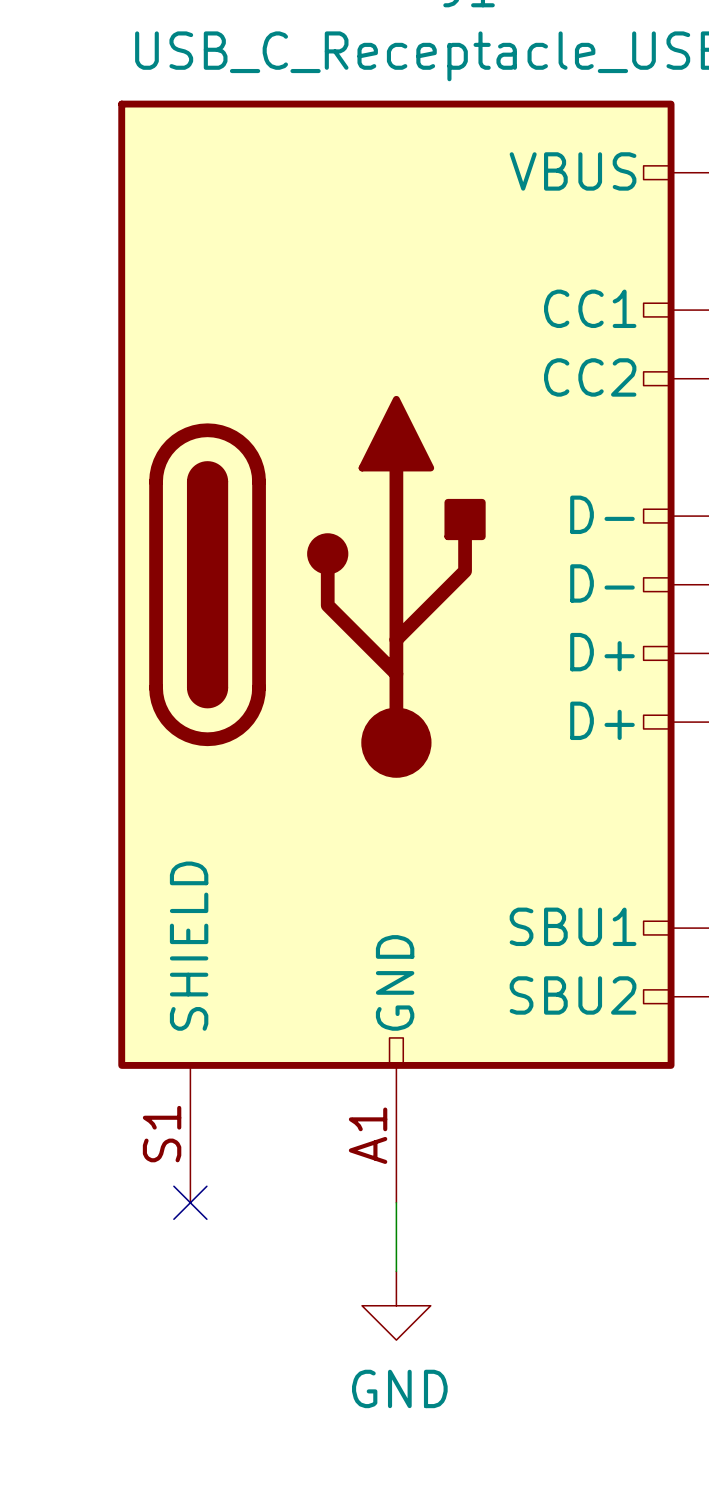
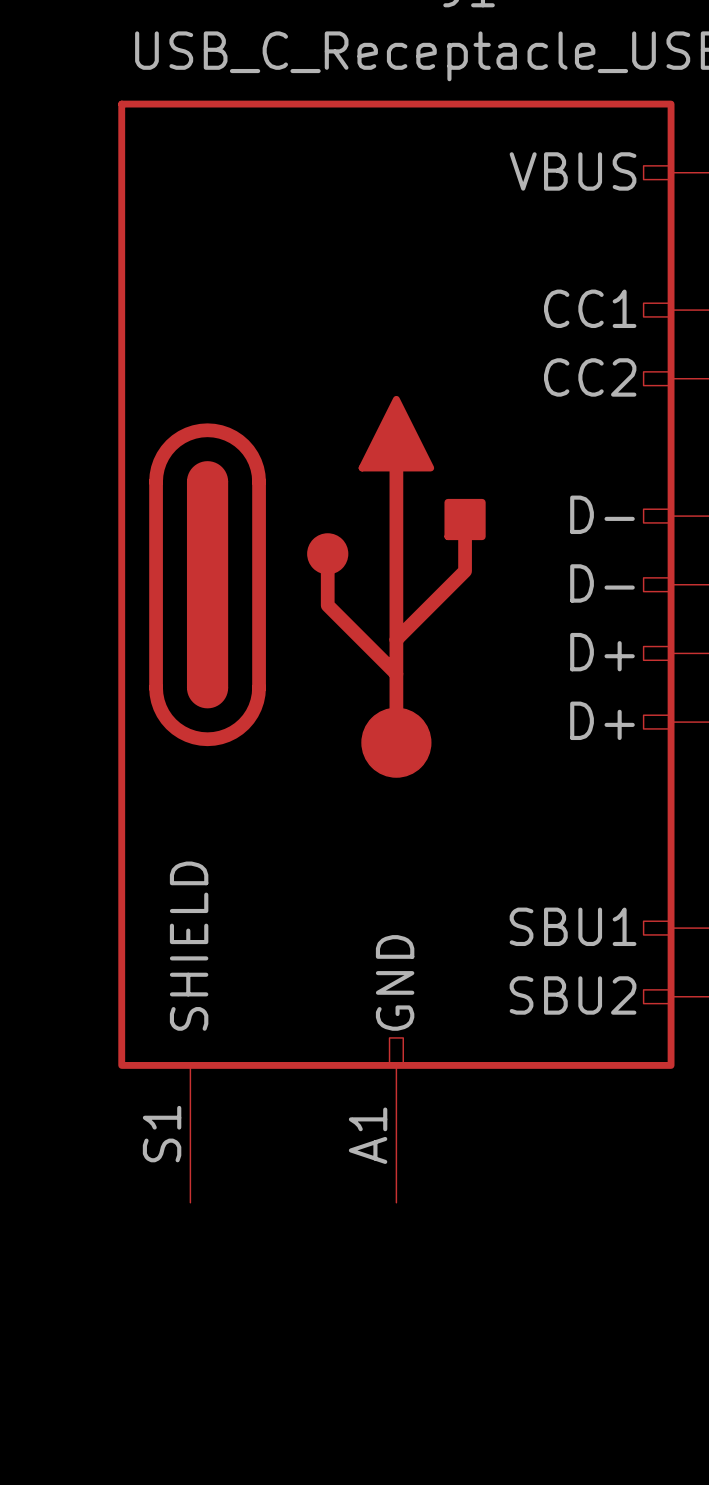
no-connect mark: (190, 1202) -> none
wire: (396, 1202) (396, 1271) -> none
power symbol: GND (396, 1305) -> none

